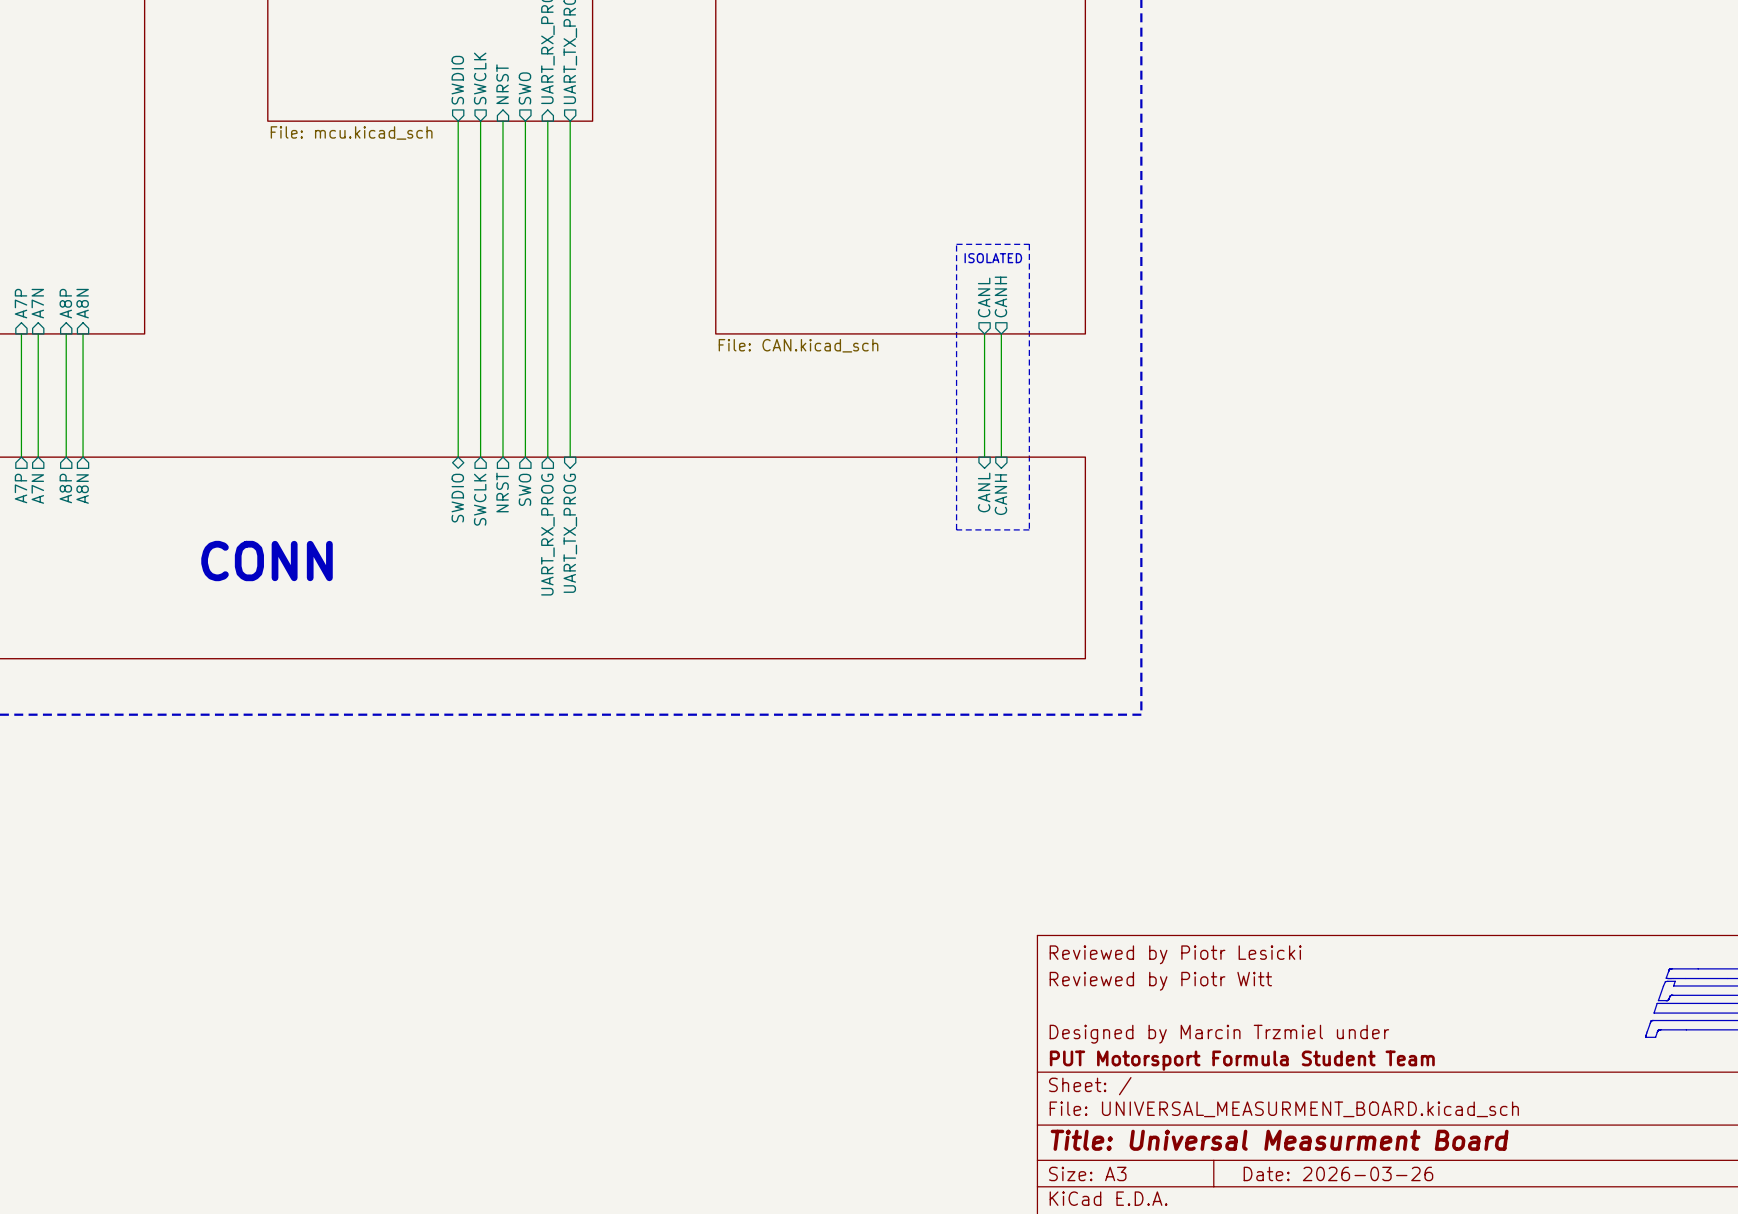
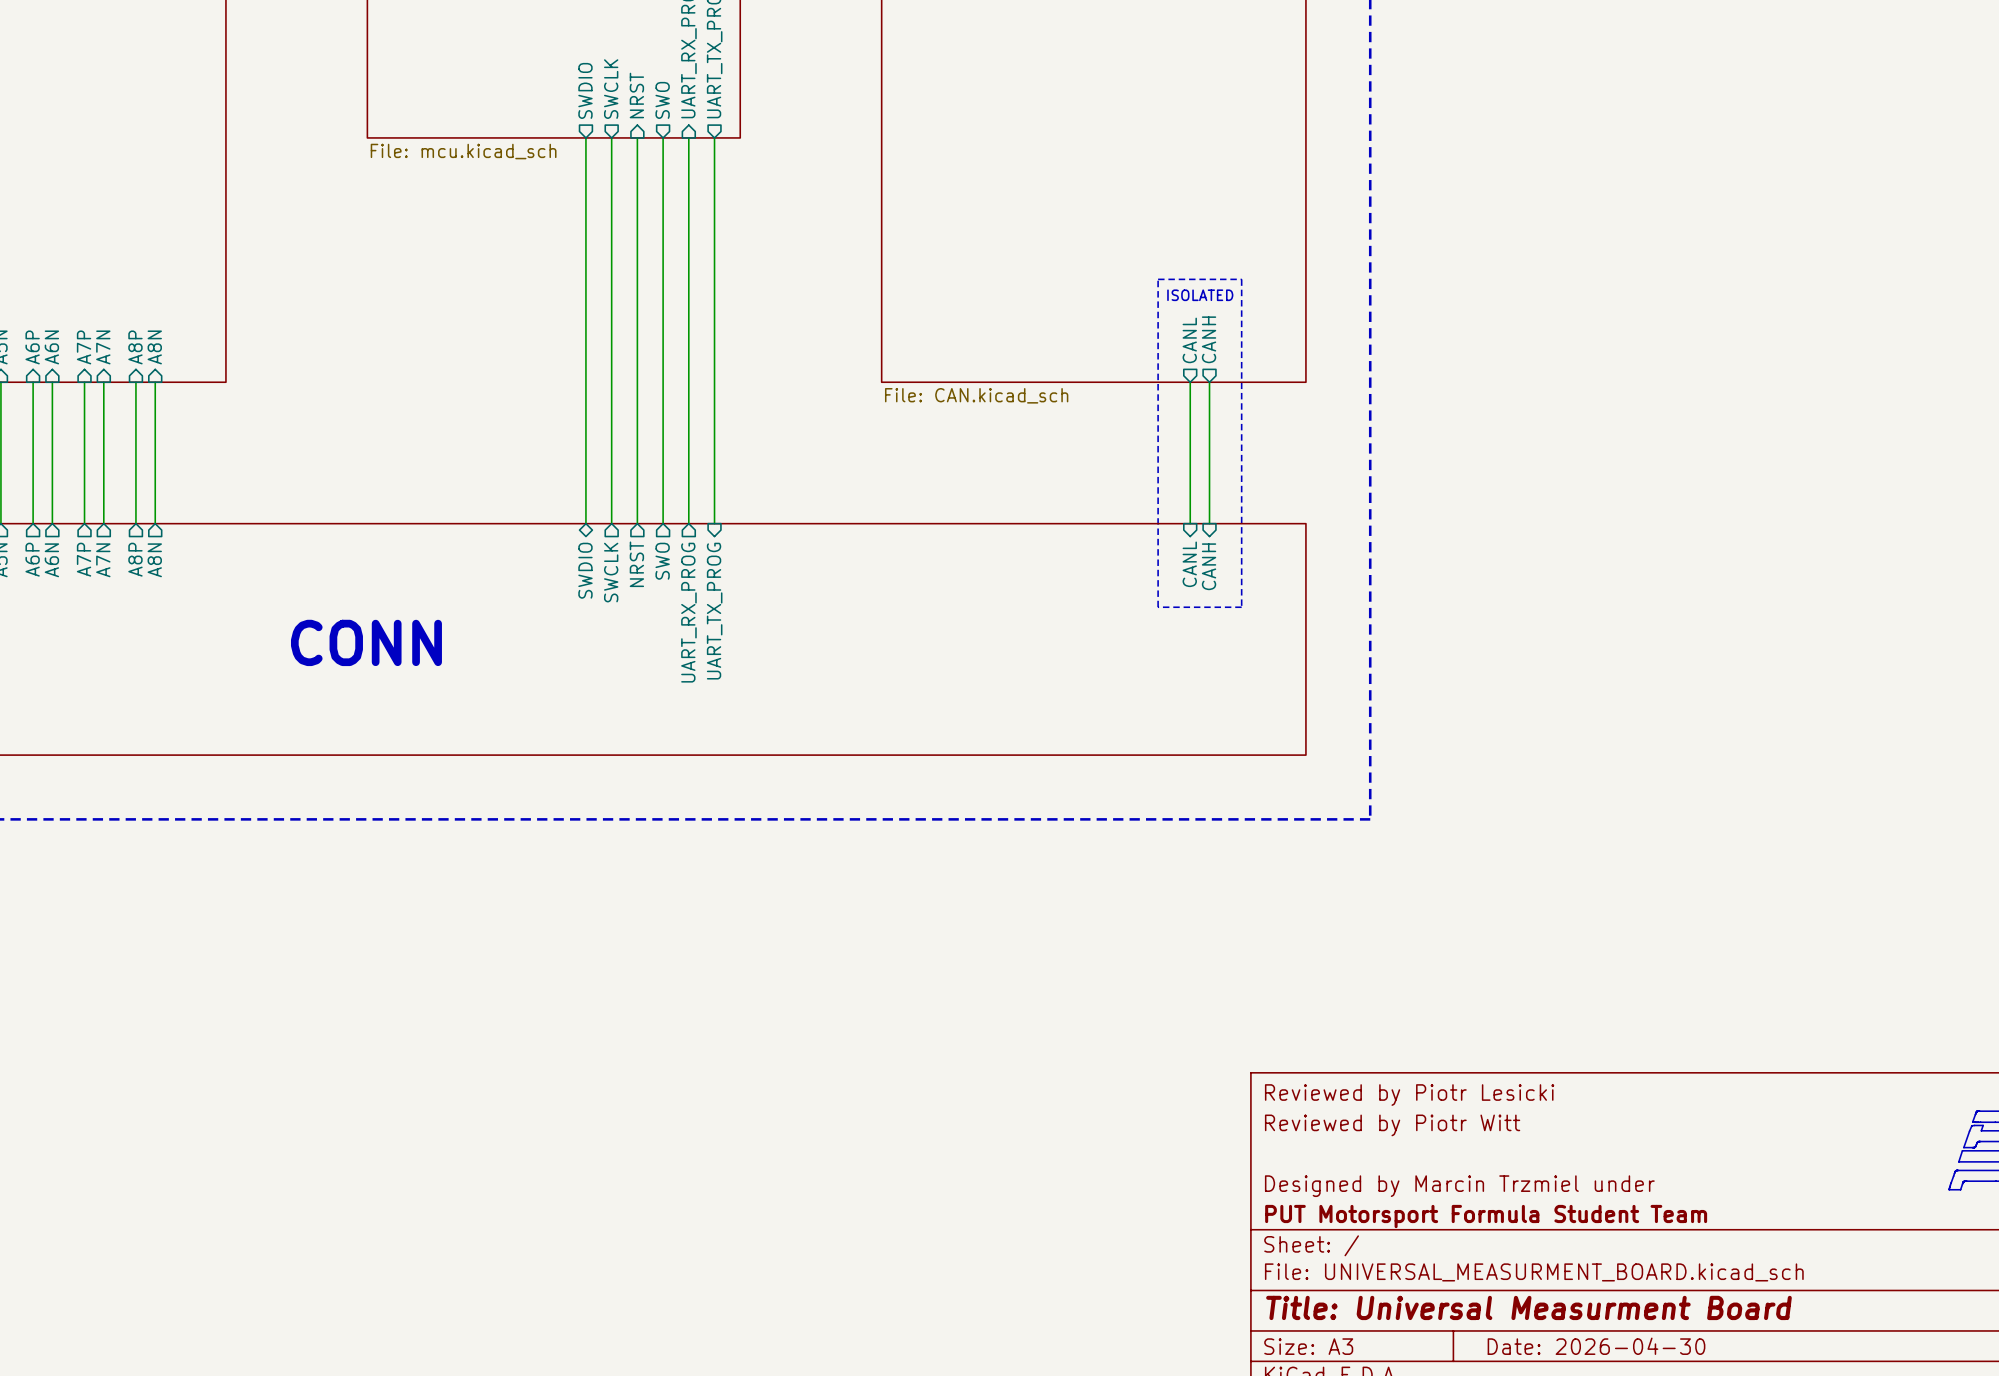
title block: Date: 2026-03-26 (1338, 1173) -> Date: 2026-04-30 (1596, 1346)

